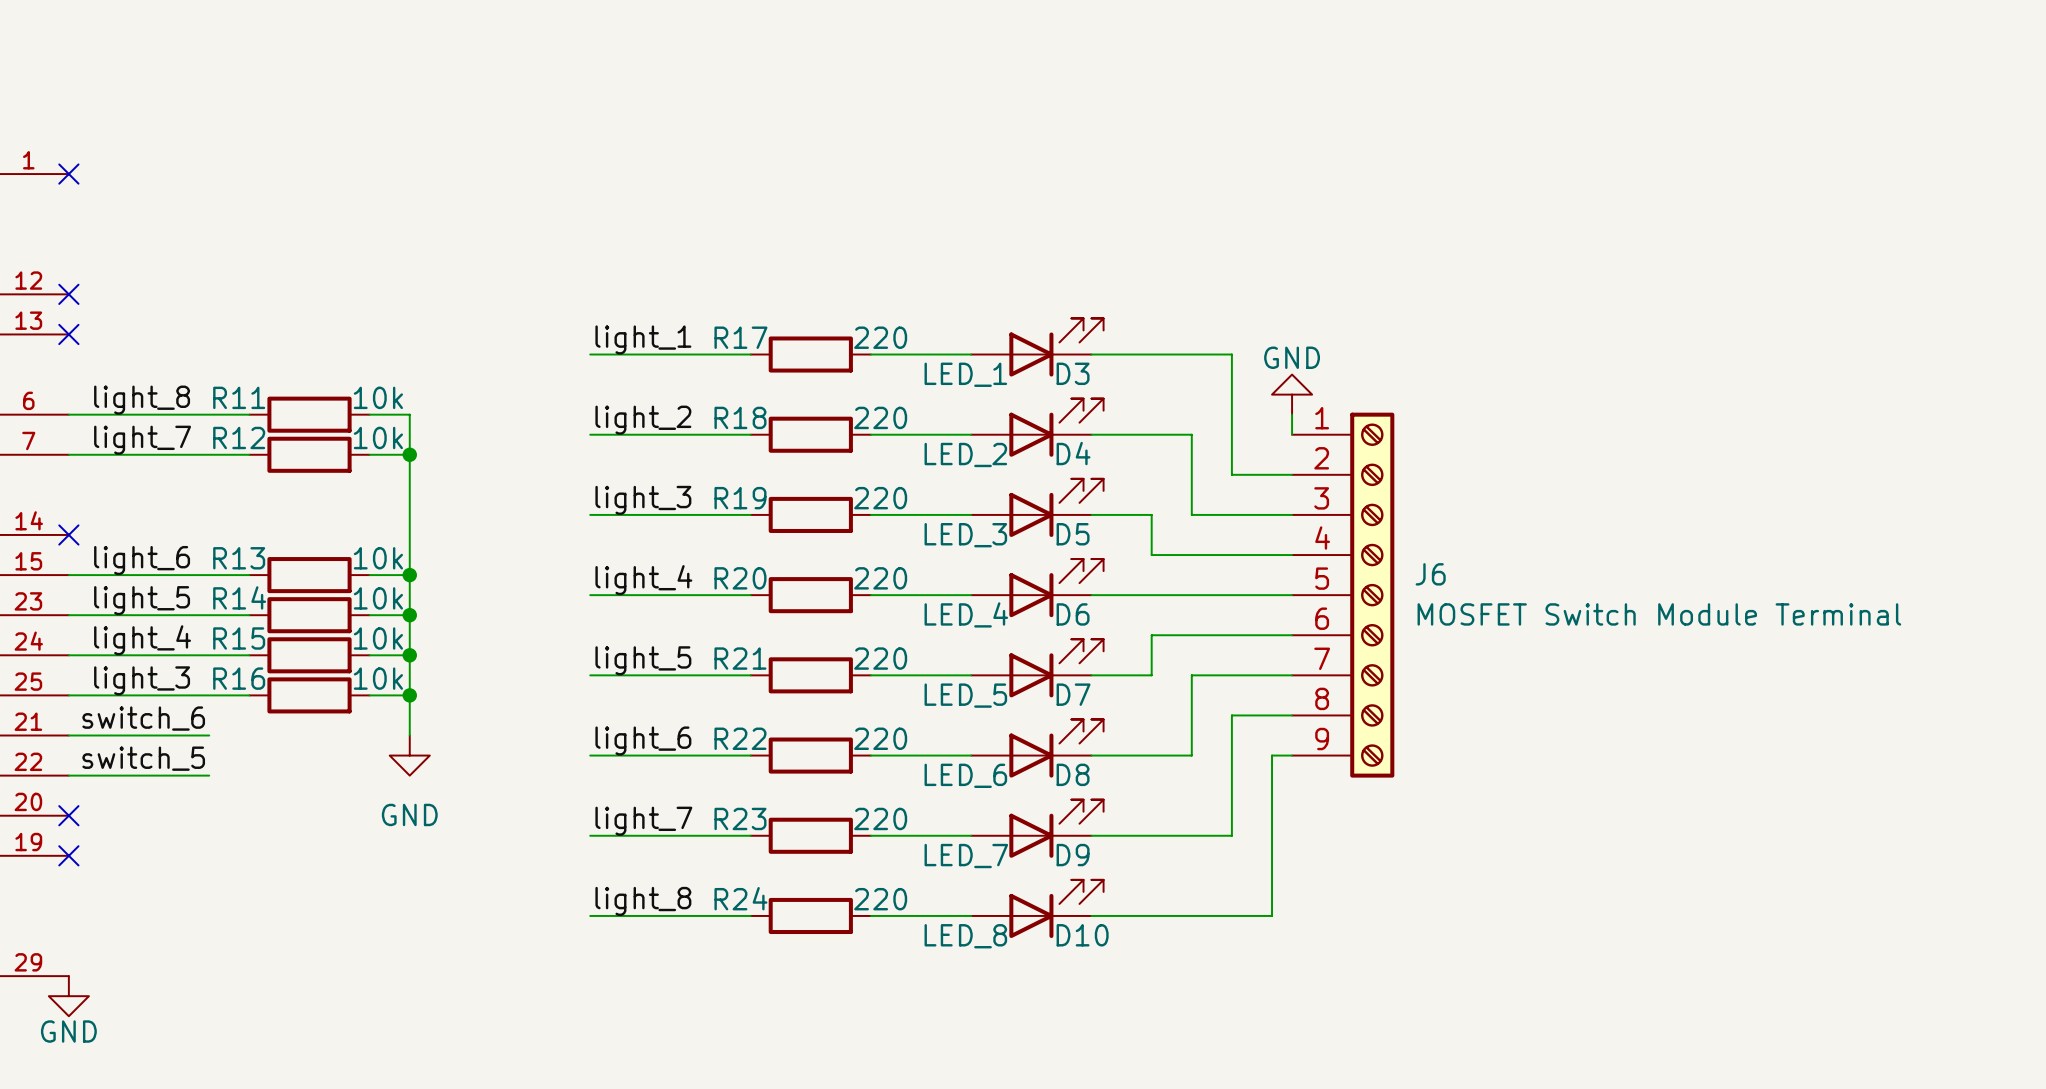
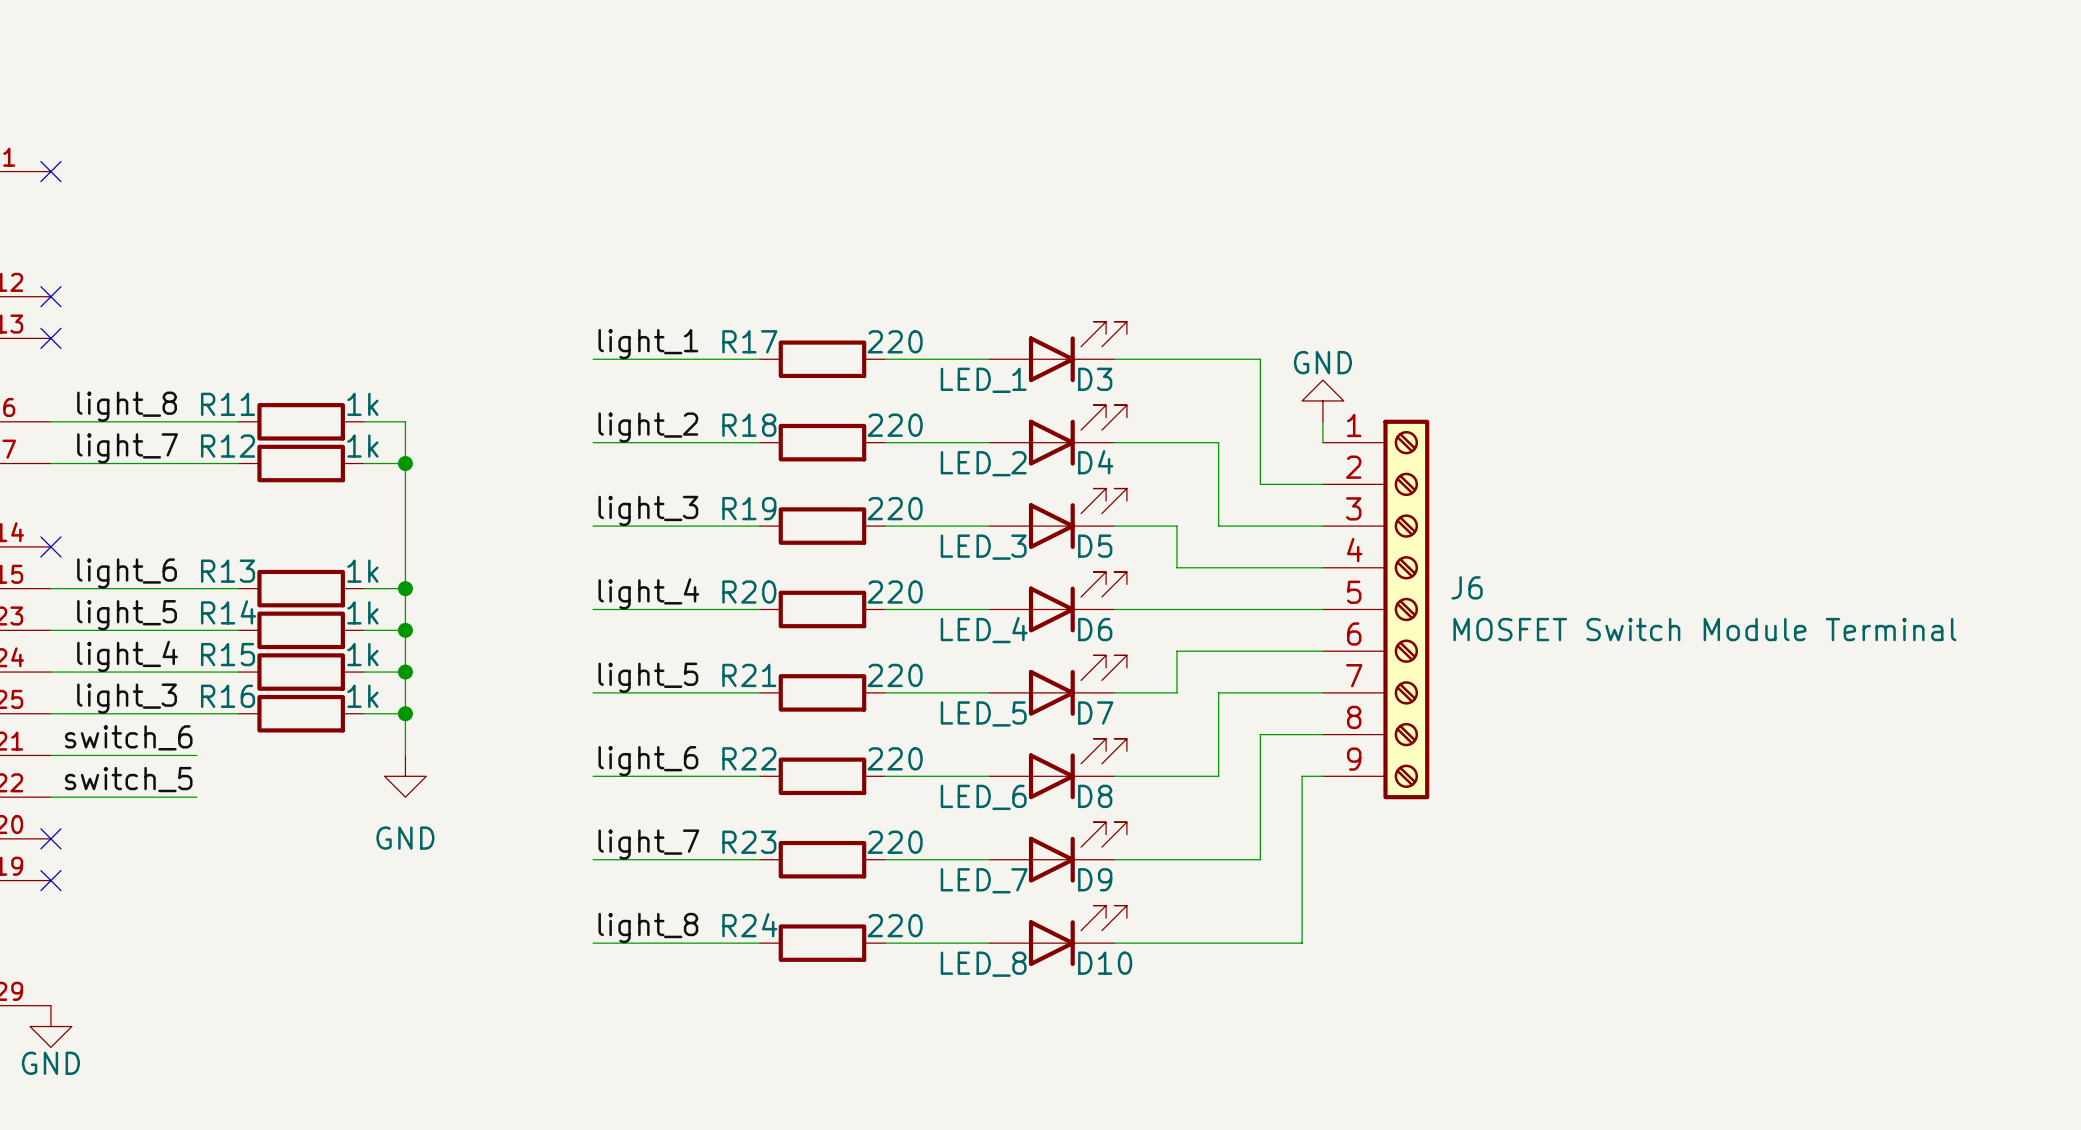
R11 value: 10k (378, 397) -> 1k (362, 404)
R12 value: 10k (378, 437) -> 1k (362, 446)
R13 value: 10k (378, 558) -> 1k (362, 571)
R14 value: 10k (378, 598) -> 1k (362, 612)
R15 value: 10k (378, 638) -> 1k (362, 654)
R16 value: 10k (378, 678) -> 1k (362, 696)

